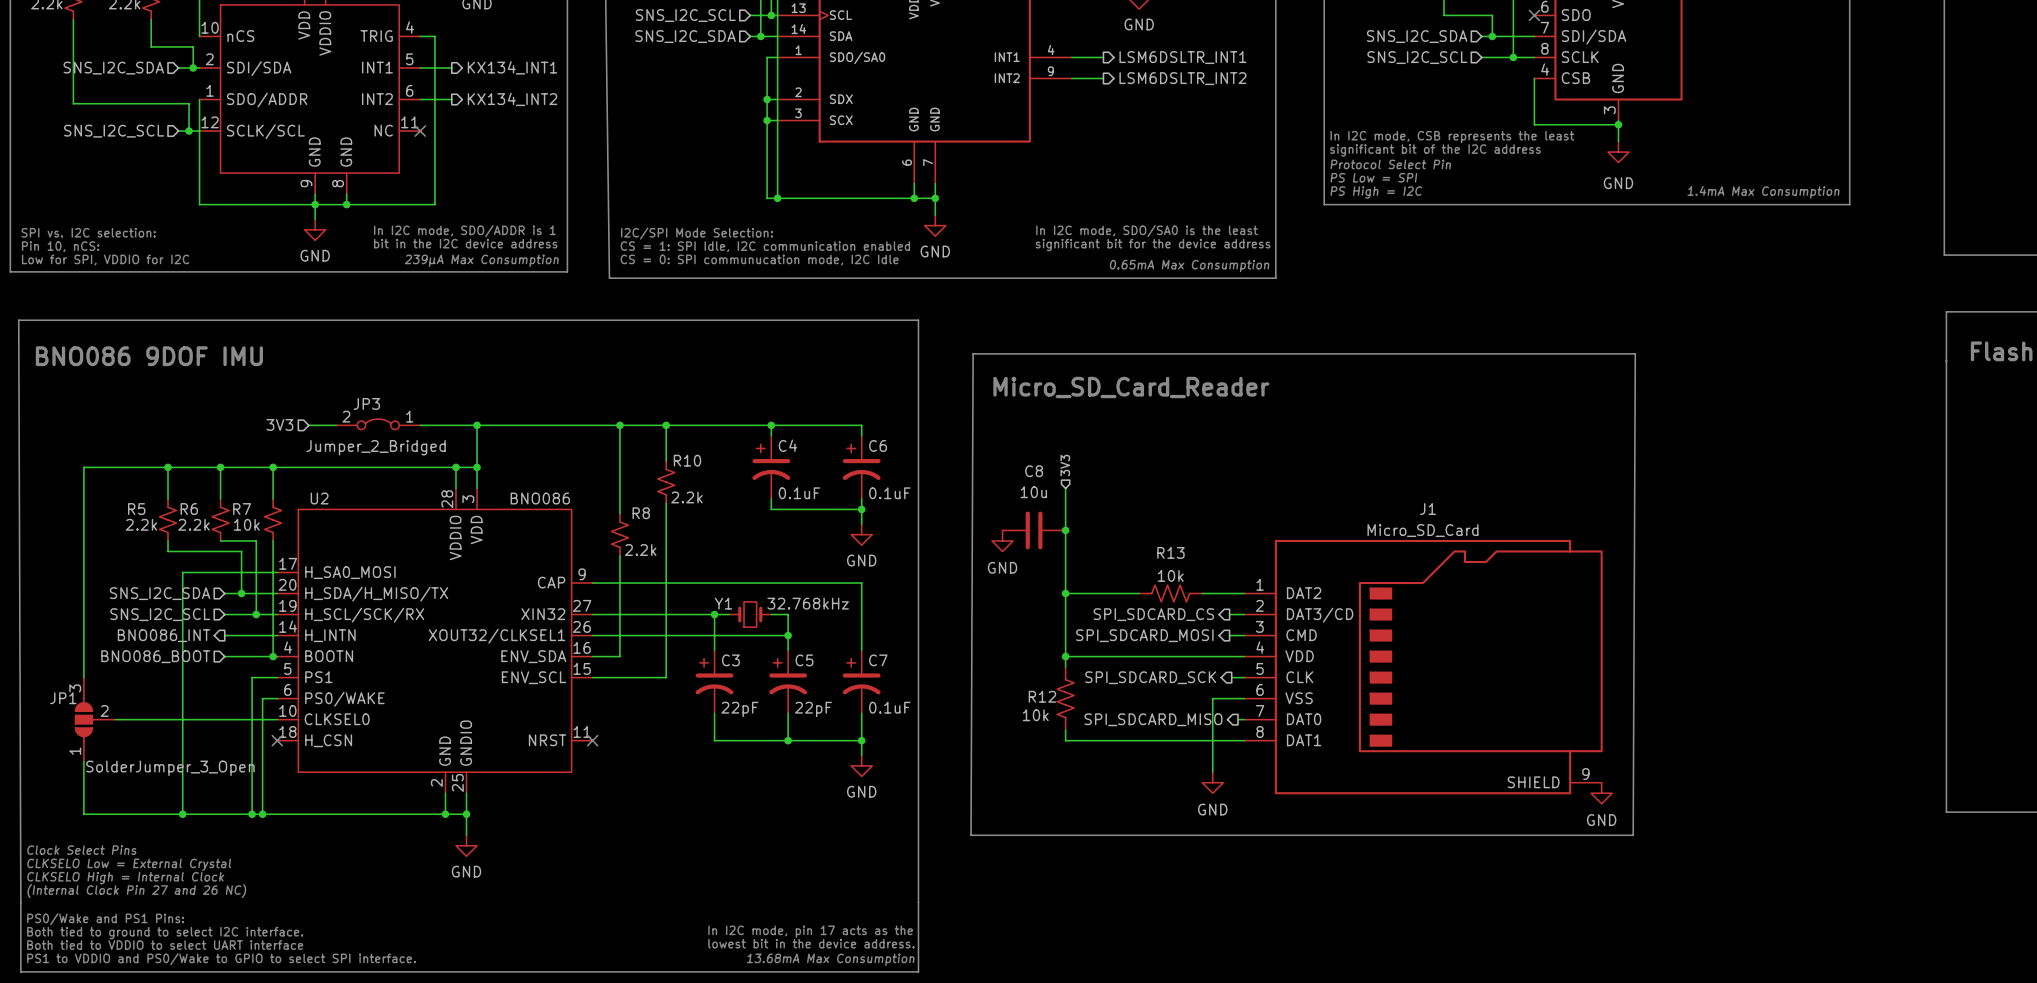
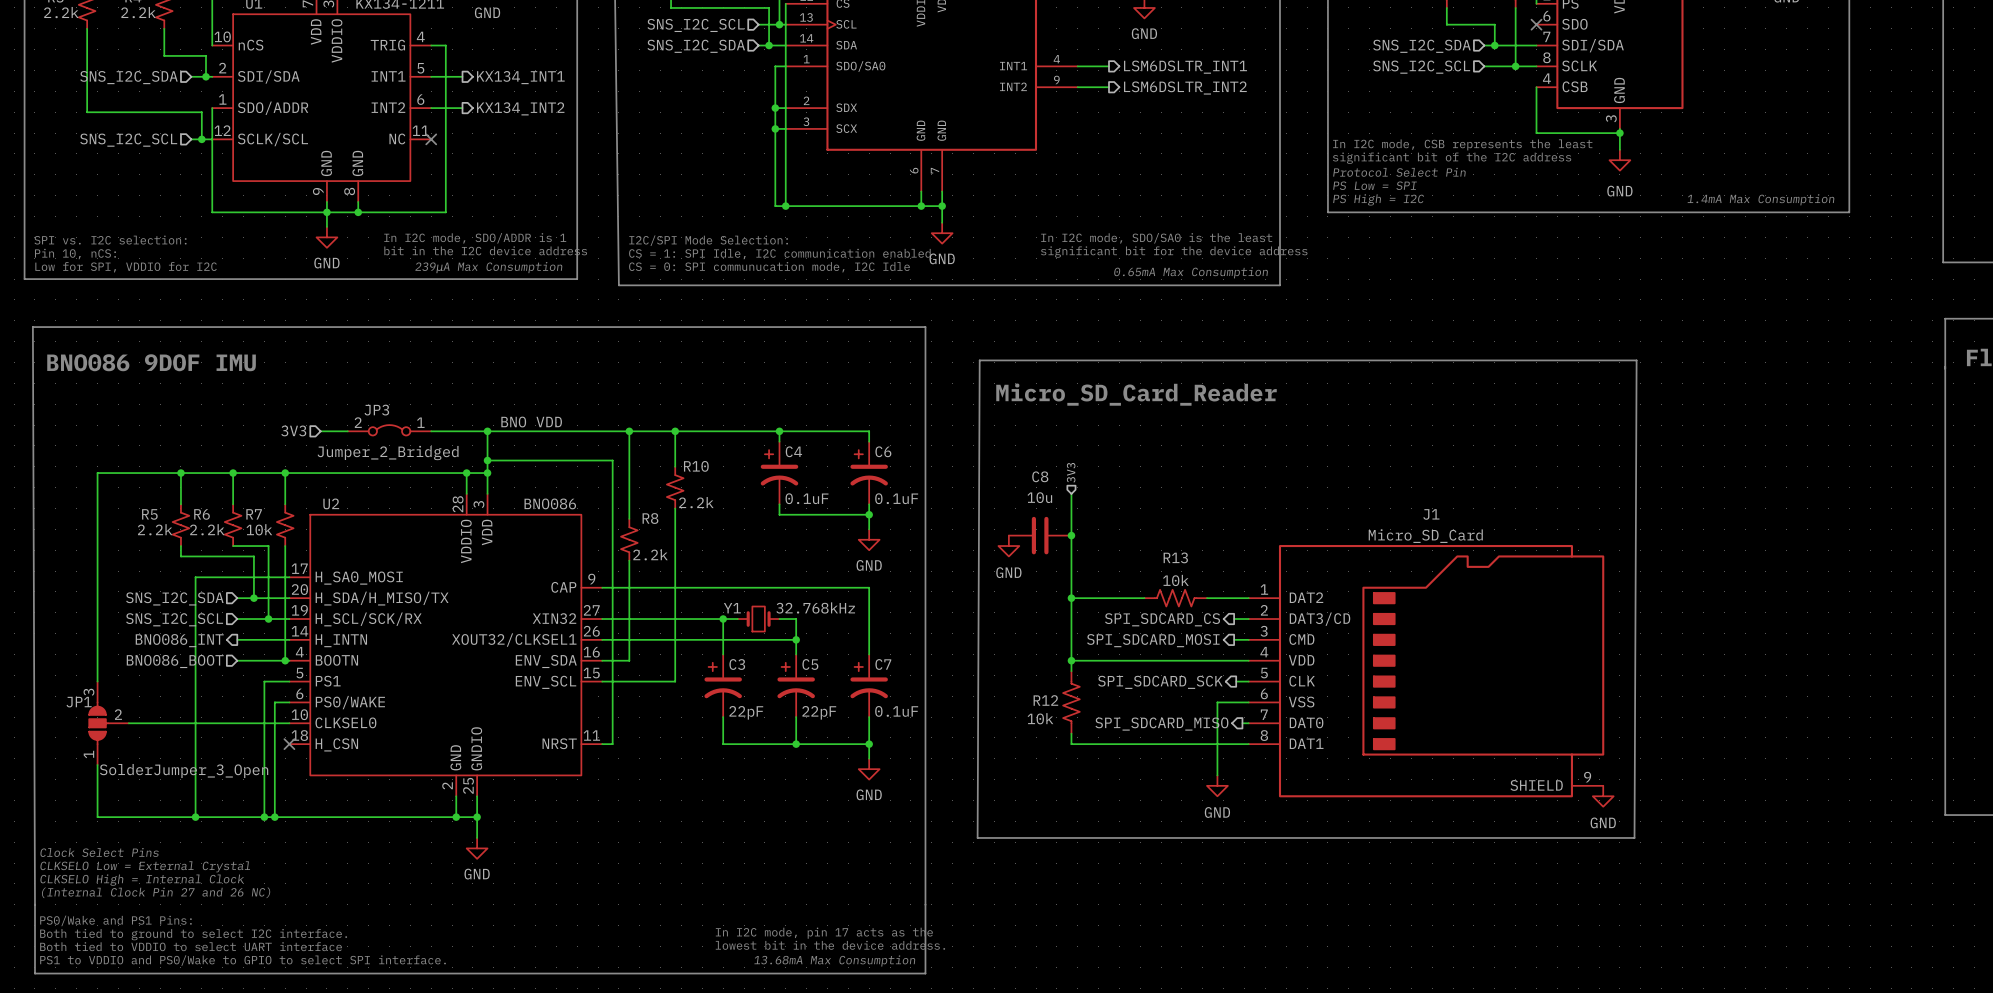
label: none -> BNO VDD (531, 422)
wire: none -> (487, 460) (612, 460) (612, 744) (602, 744)
junction: none -> (487, 460)
no-connect mark: (592, 740) -> none

